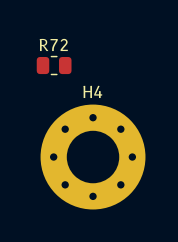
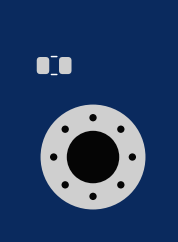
R72 name: R72 (53, 44) -> none
H4 name: H4 (92, 91) -> none

